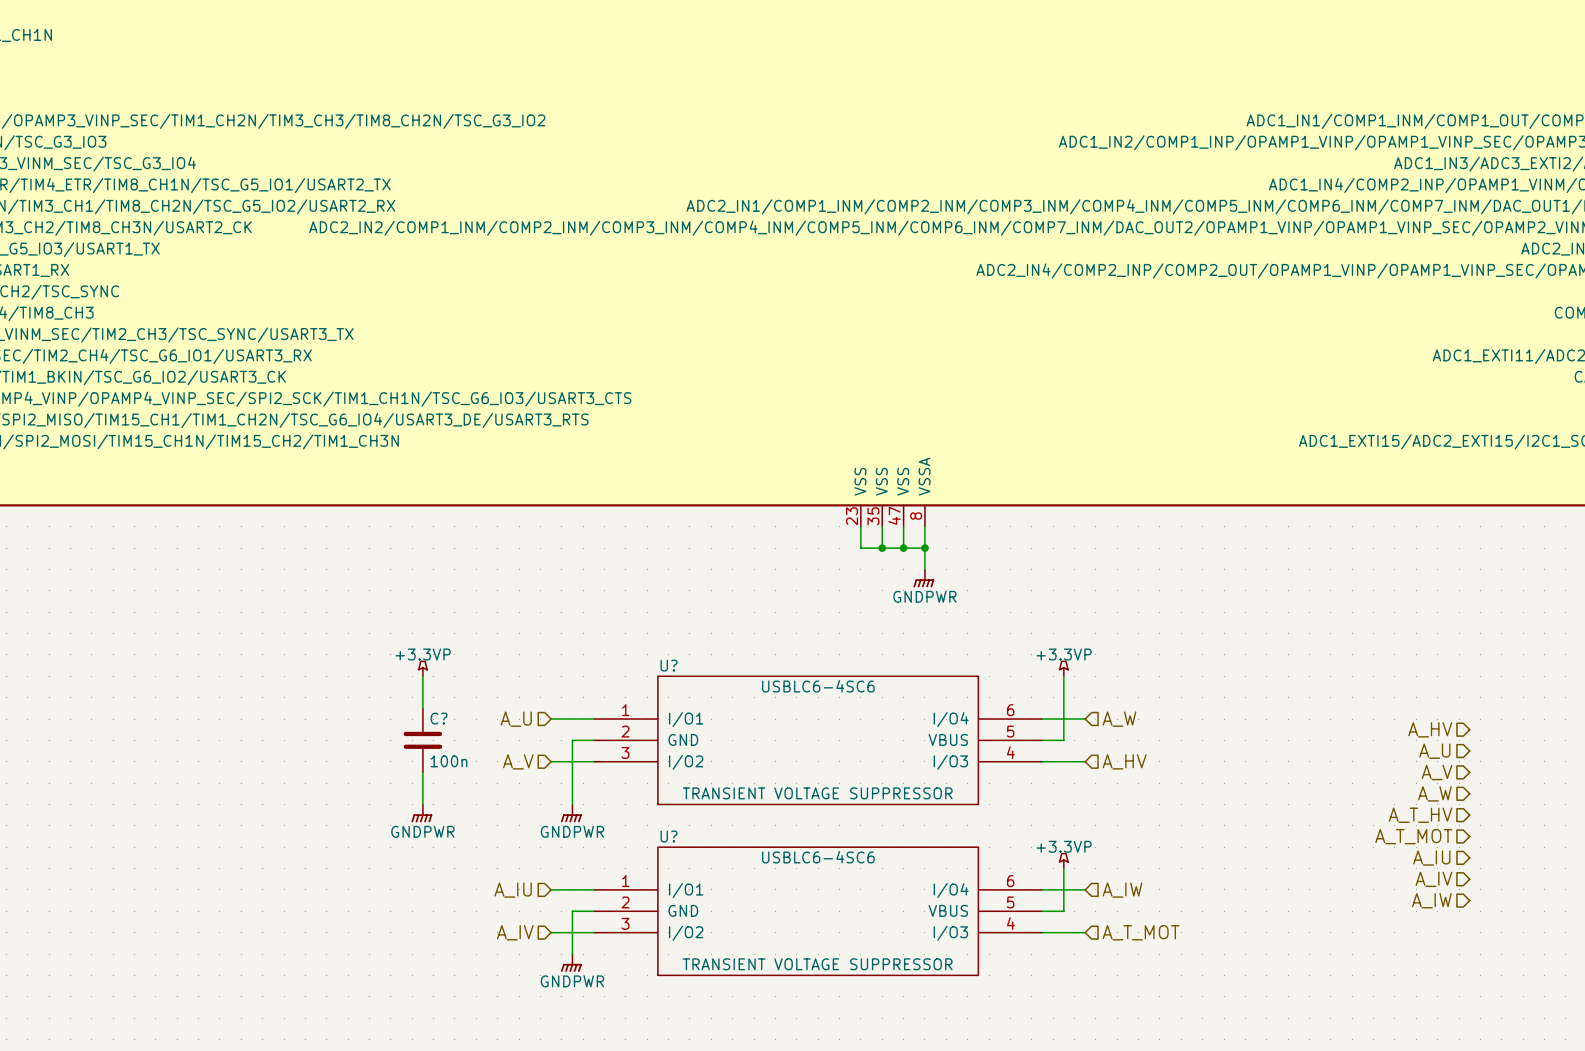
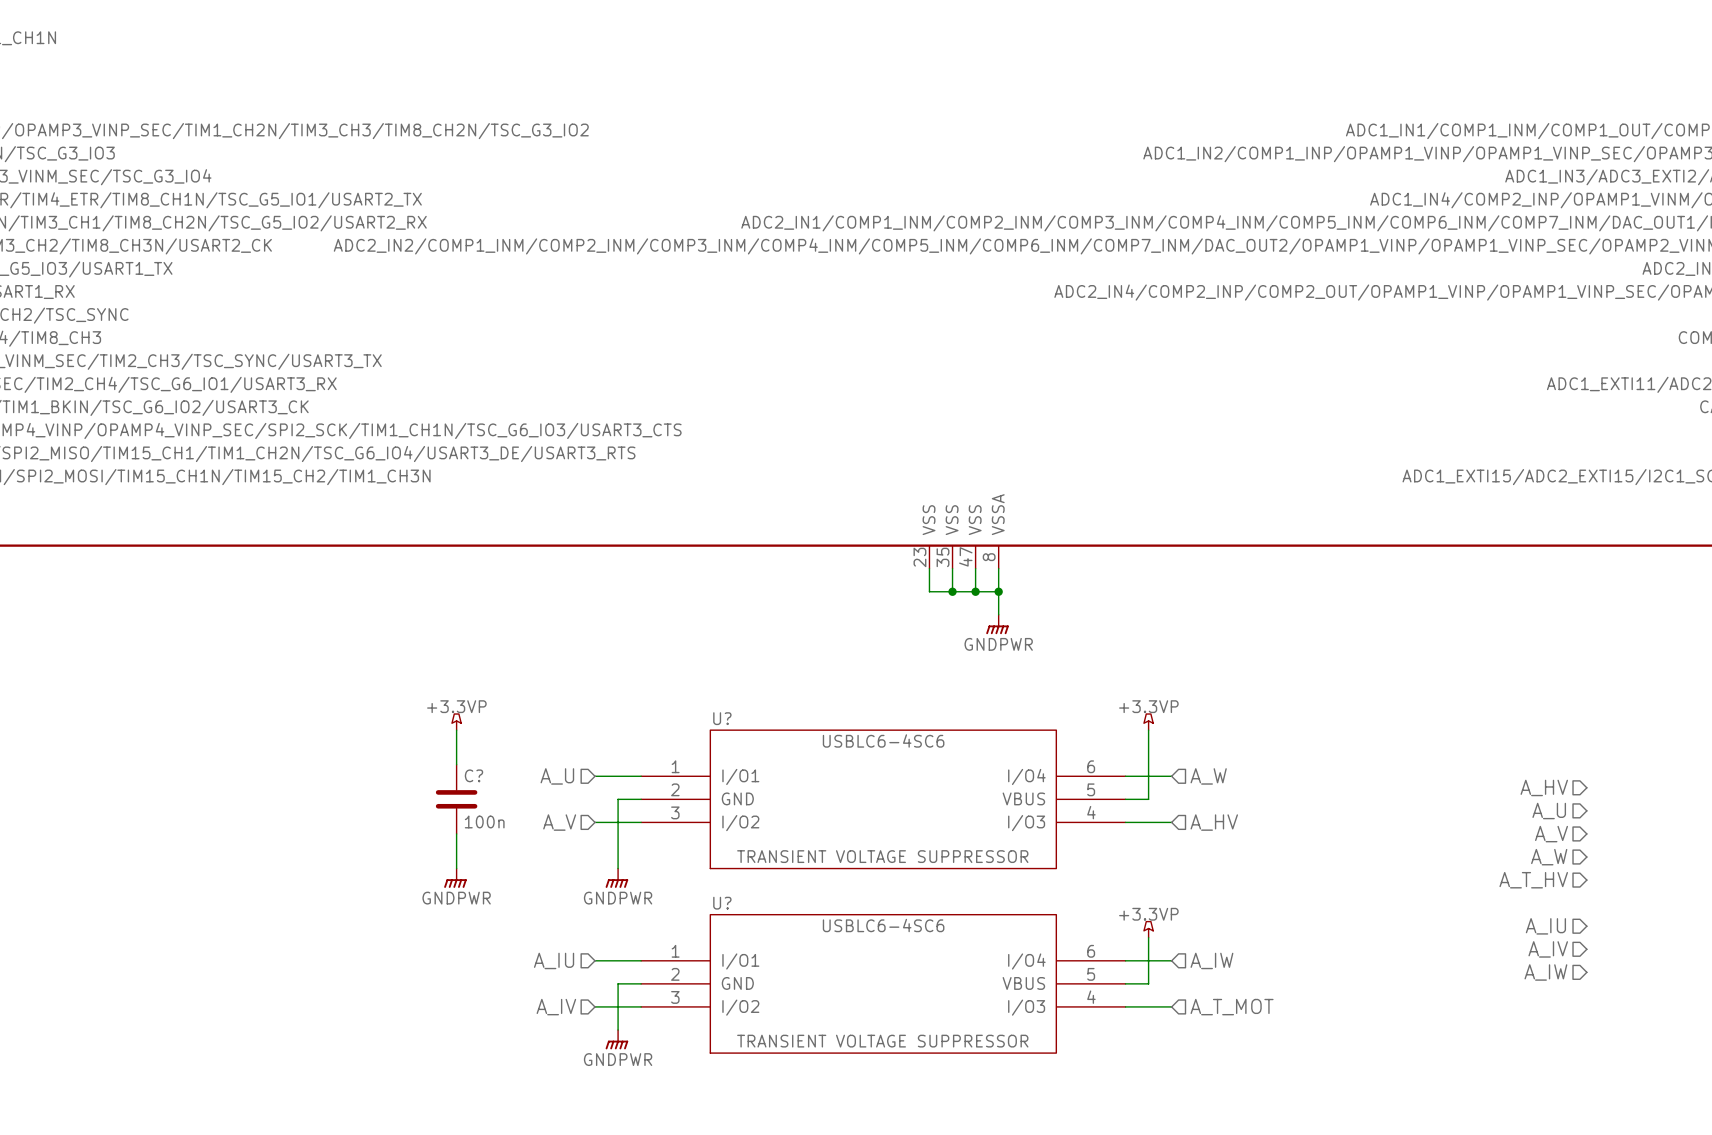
hierarchical label: A_T_MOT (1413, 836) -> none

